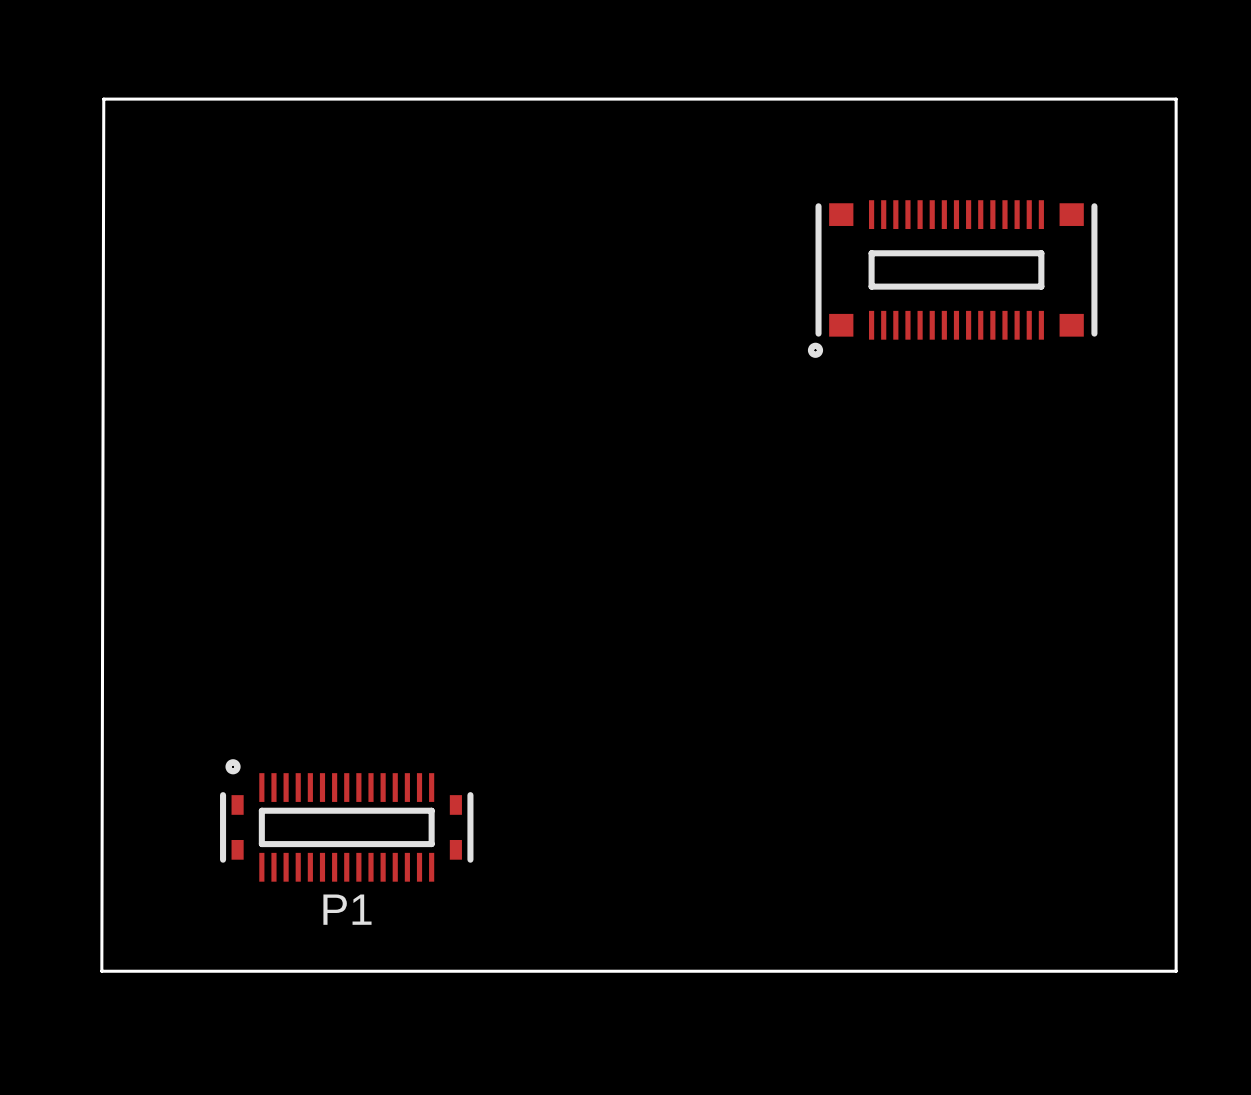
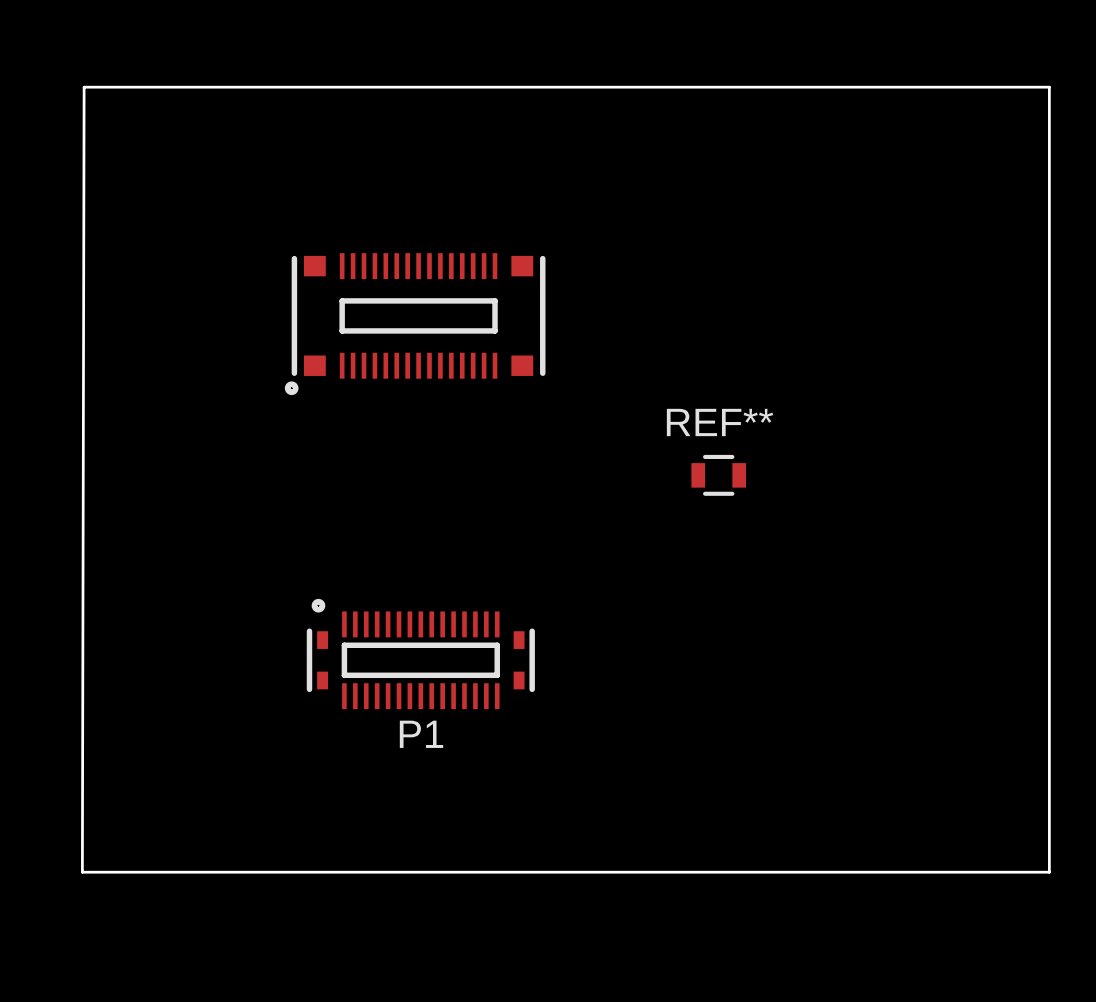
part position: (952, 279) -> (415, 324)
REF**: none -> (718, 475)
P1 position: (346, 820) -> (420, 654)

